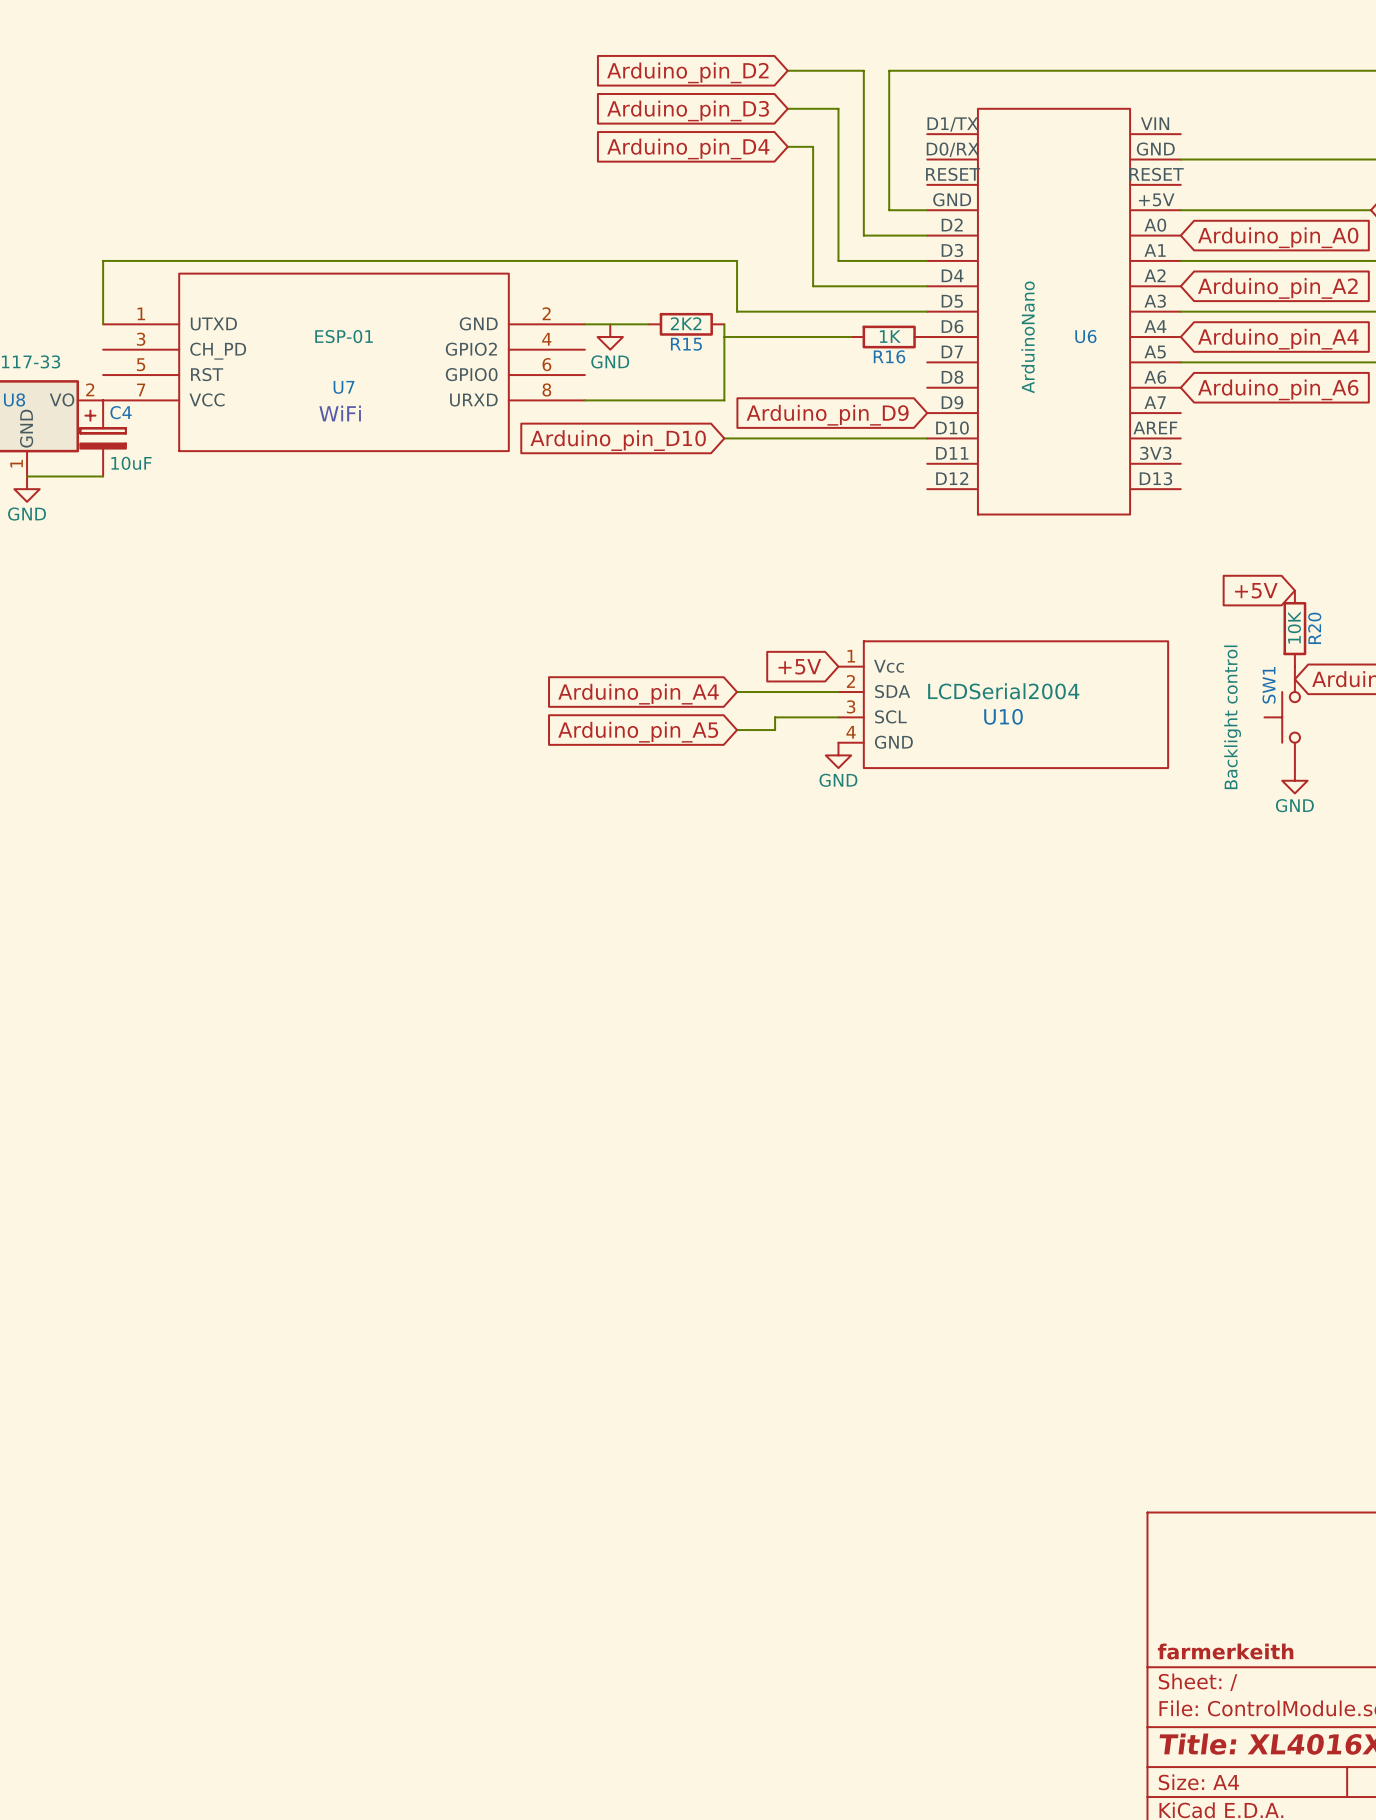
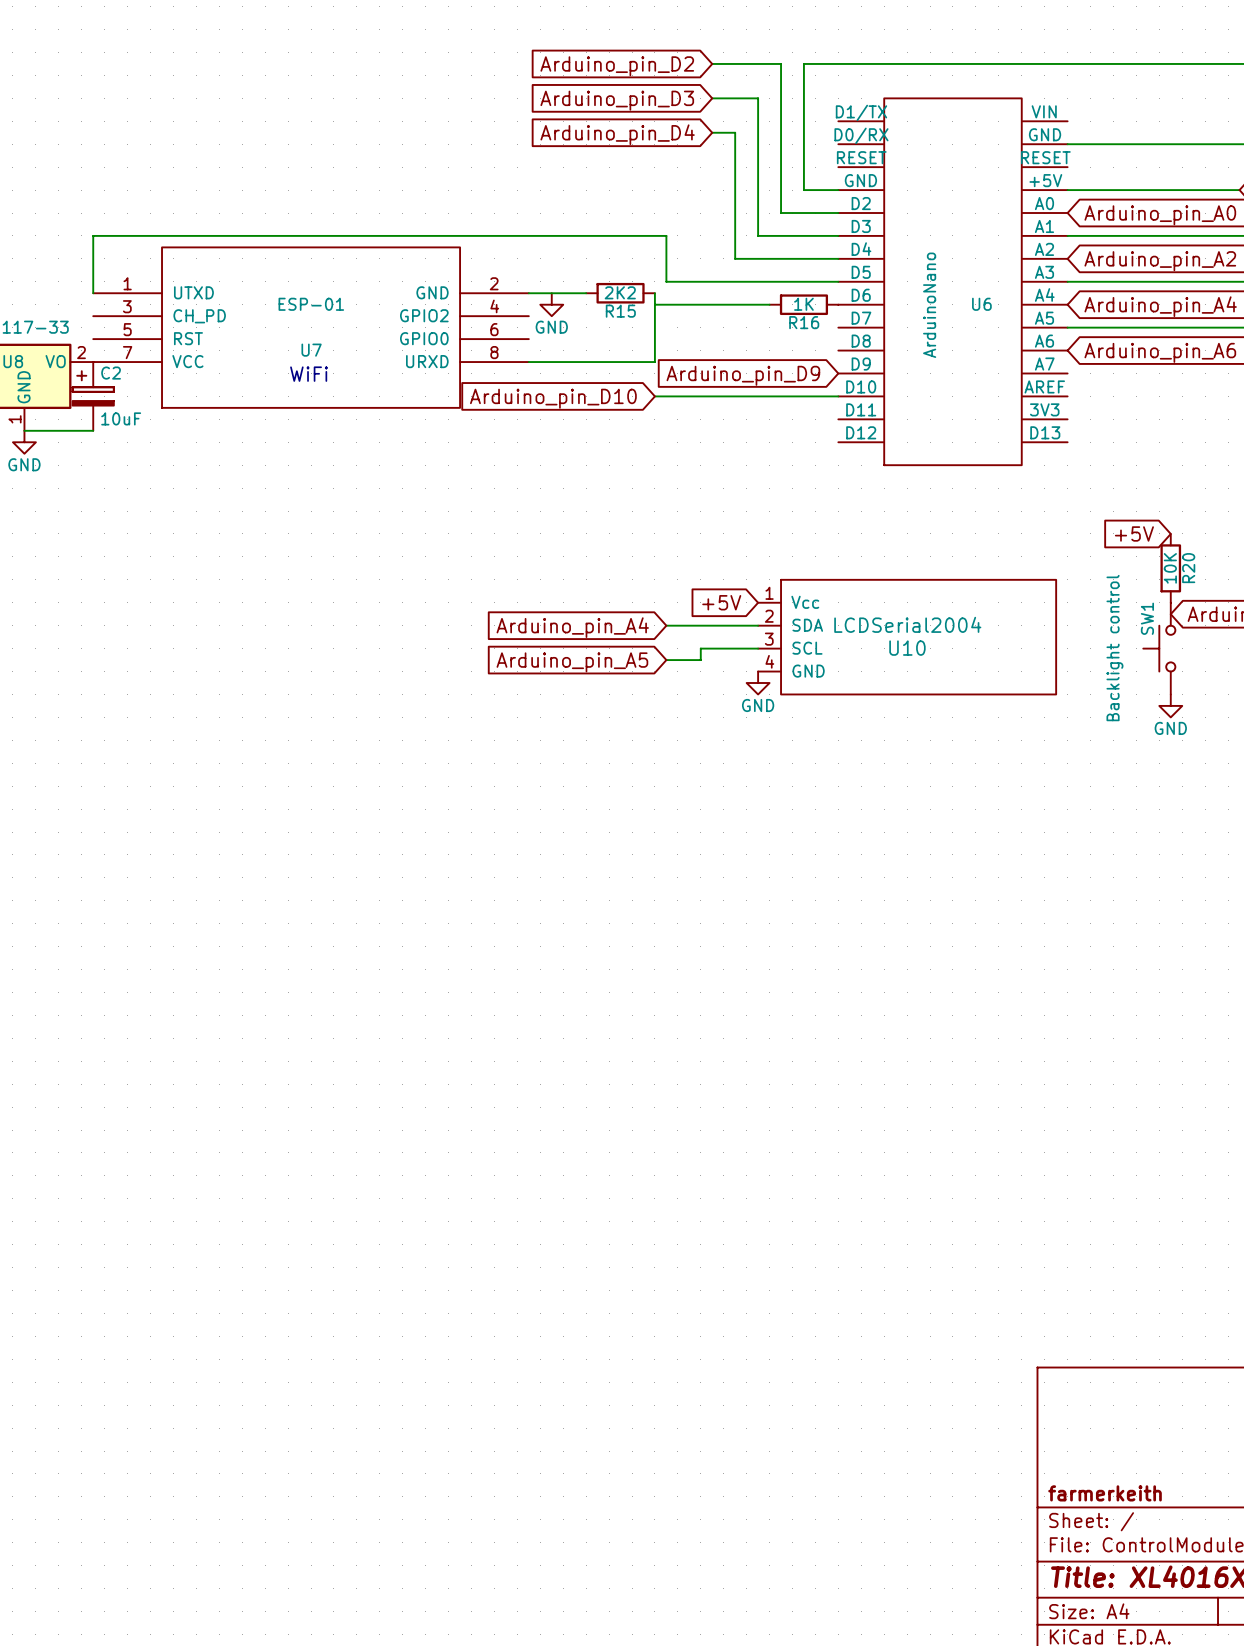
C4 name: C4 (121, 412) -> C2 (111, 373)

